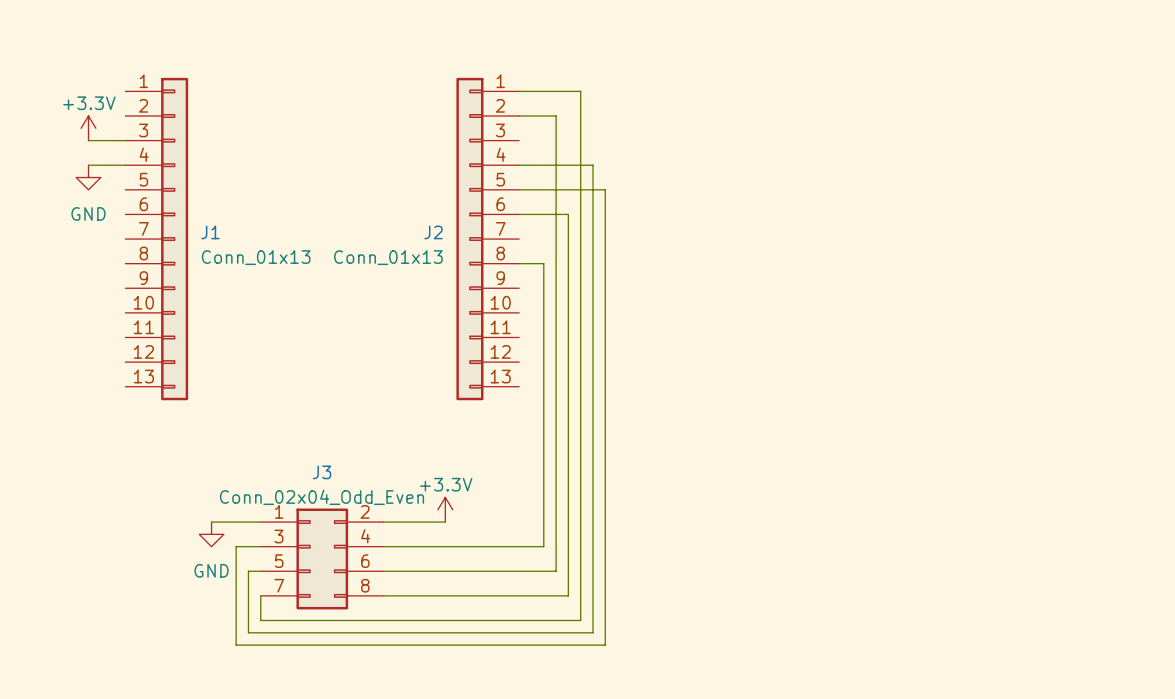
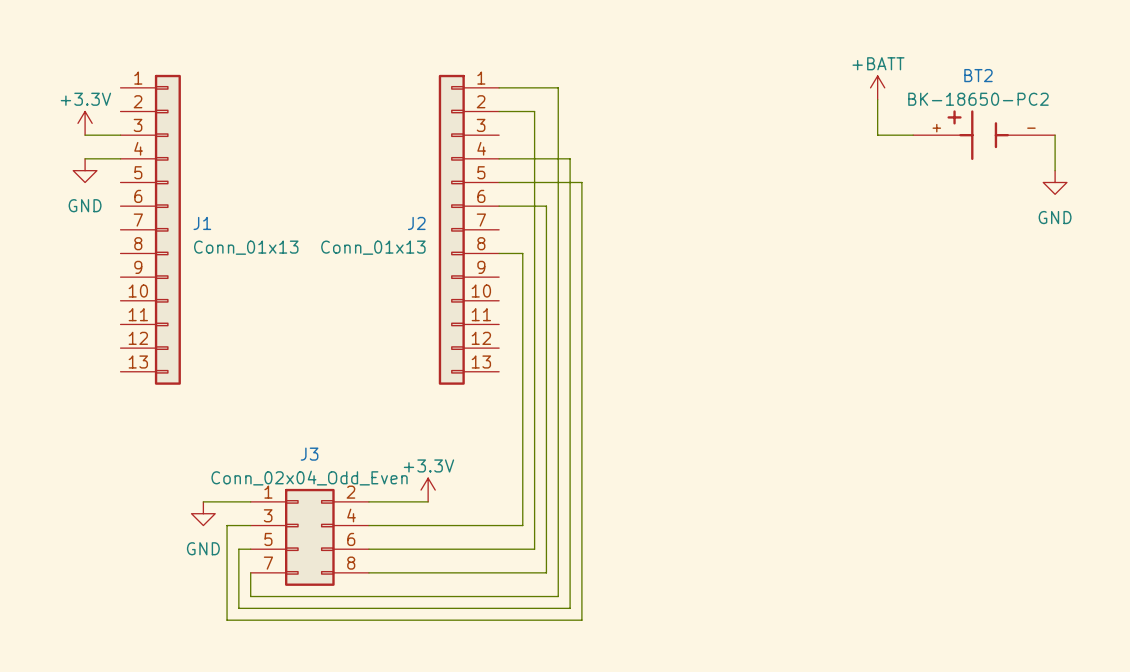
power symbol: none -> +BATT (877, 87)
wire: none -> (877, 99) (877, 135) (913, 135)
BT2: none -> BK-18650-PC2 (984, 135)
wire: none -> (1055, 135) (1055, 170)
power symbol: none -> GND (1055, 182)

